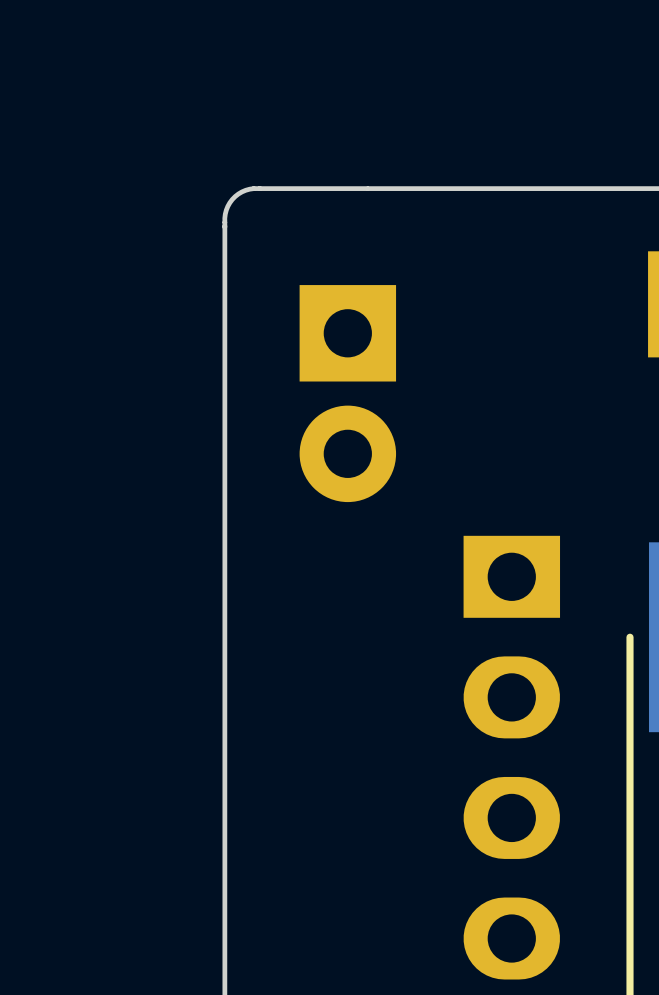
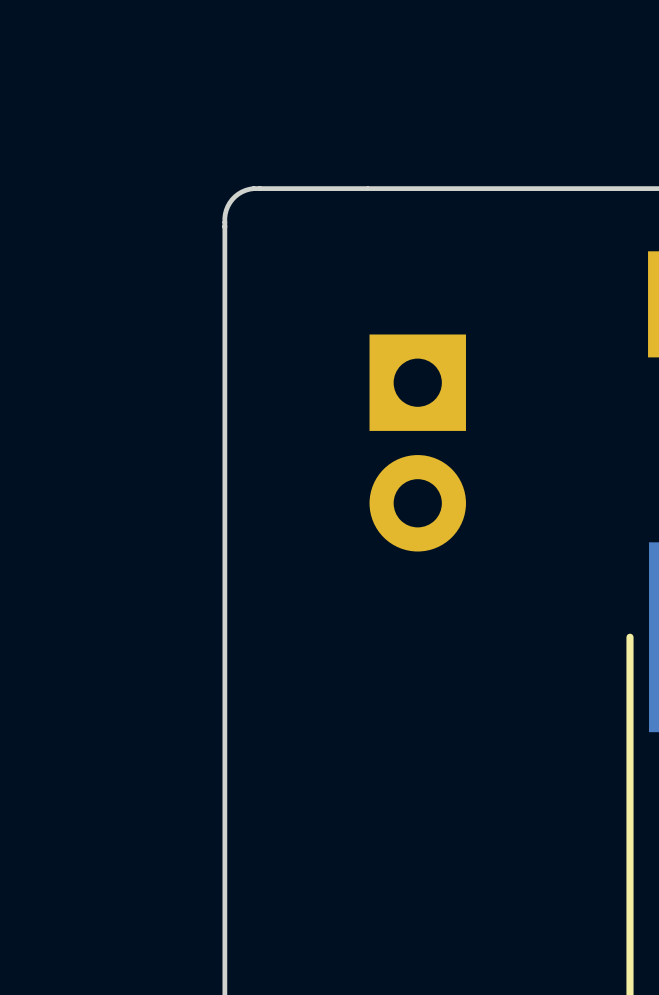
part position: (347, 393) -> (417, 442)
part: (511, 757) -> none

